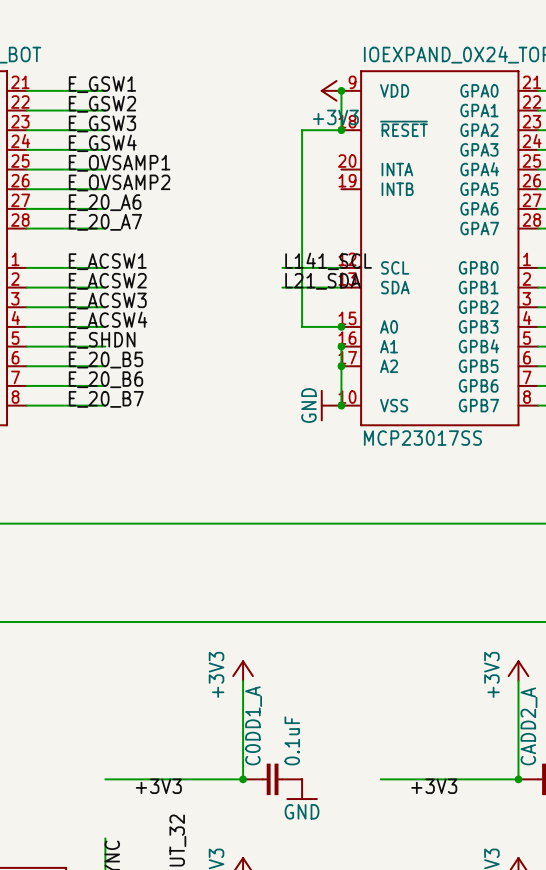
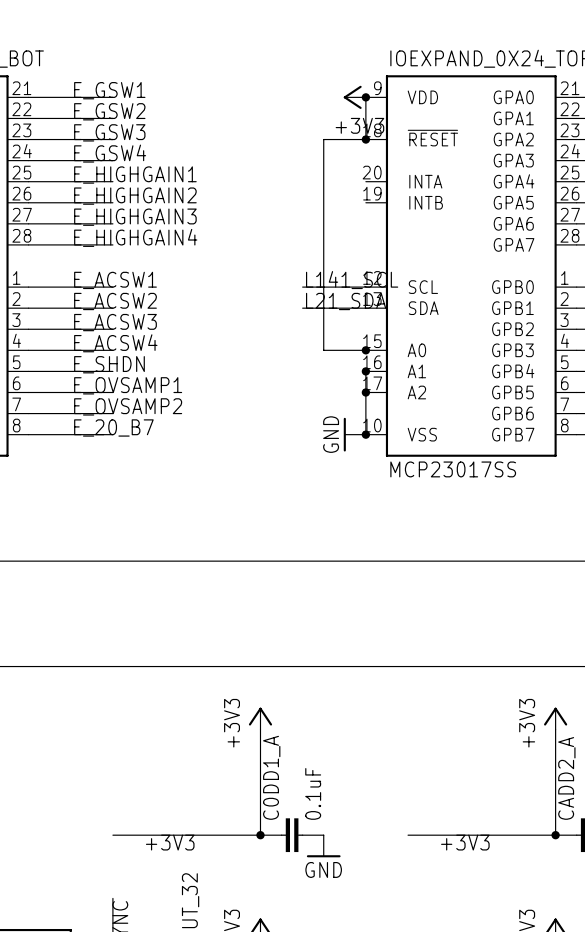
label: E_OVSAMP1 (119, 163) -> E_HIGHGAIN1 (135, 175)
label: E_OVSAMP2 (119, 182) -> E_HIGHGAIN2 (135, 196)
label: E_20_A6 (105, 202) -> E_HIGHGAIN3 (135, 217)
label: E_20_A7 (105, 222) -> E_HIGHGAIN4 (135, 237)
label: E_20_B5 (106, 360) -> E_OVSAMP1 (128, 385)
label: E_20_B6 (106, 379) -> E_OVSAMP2 (128, 406)

